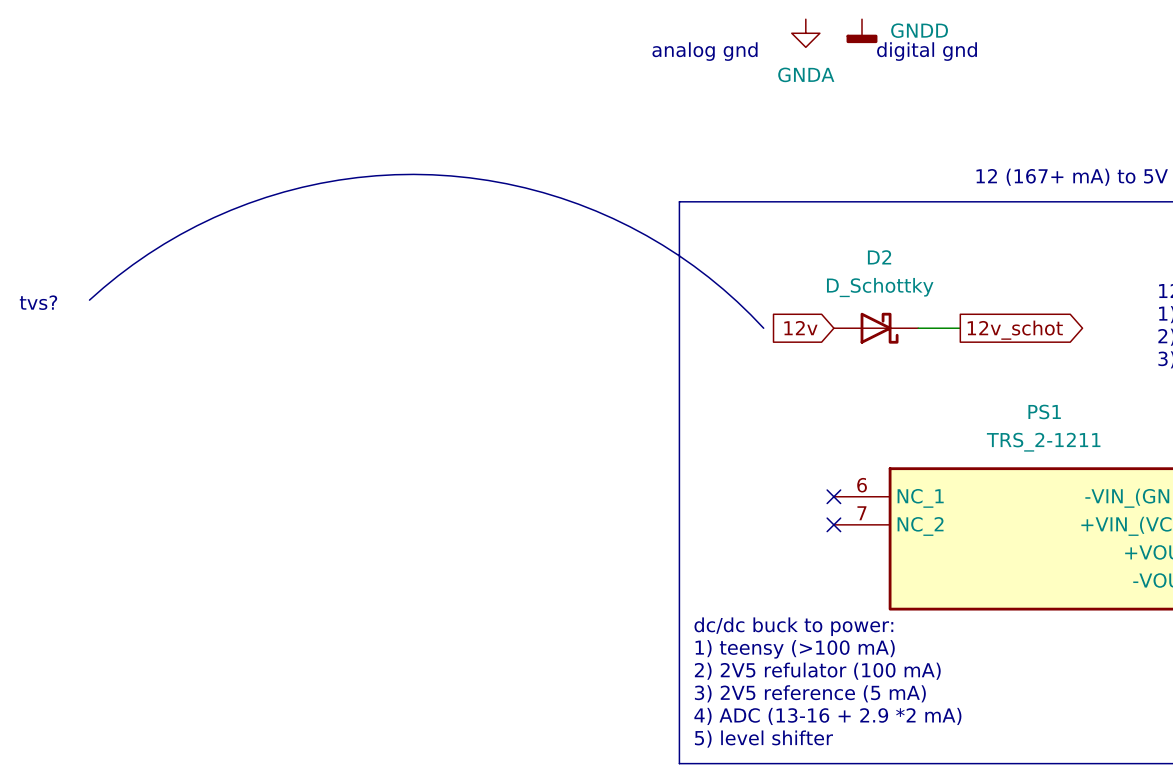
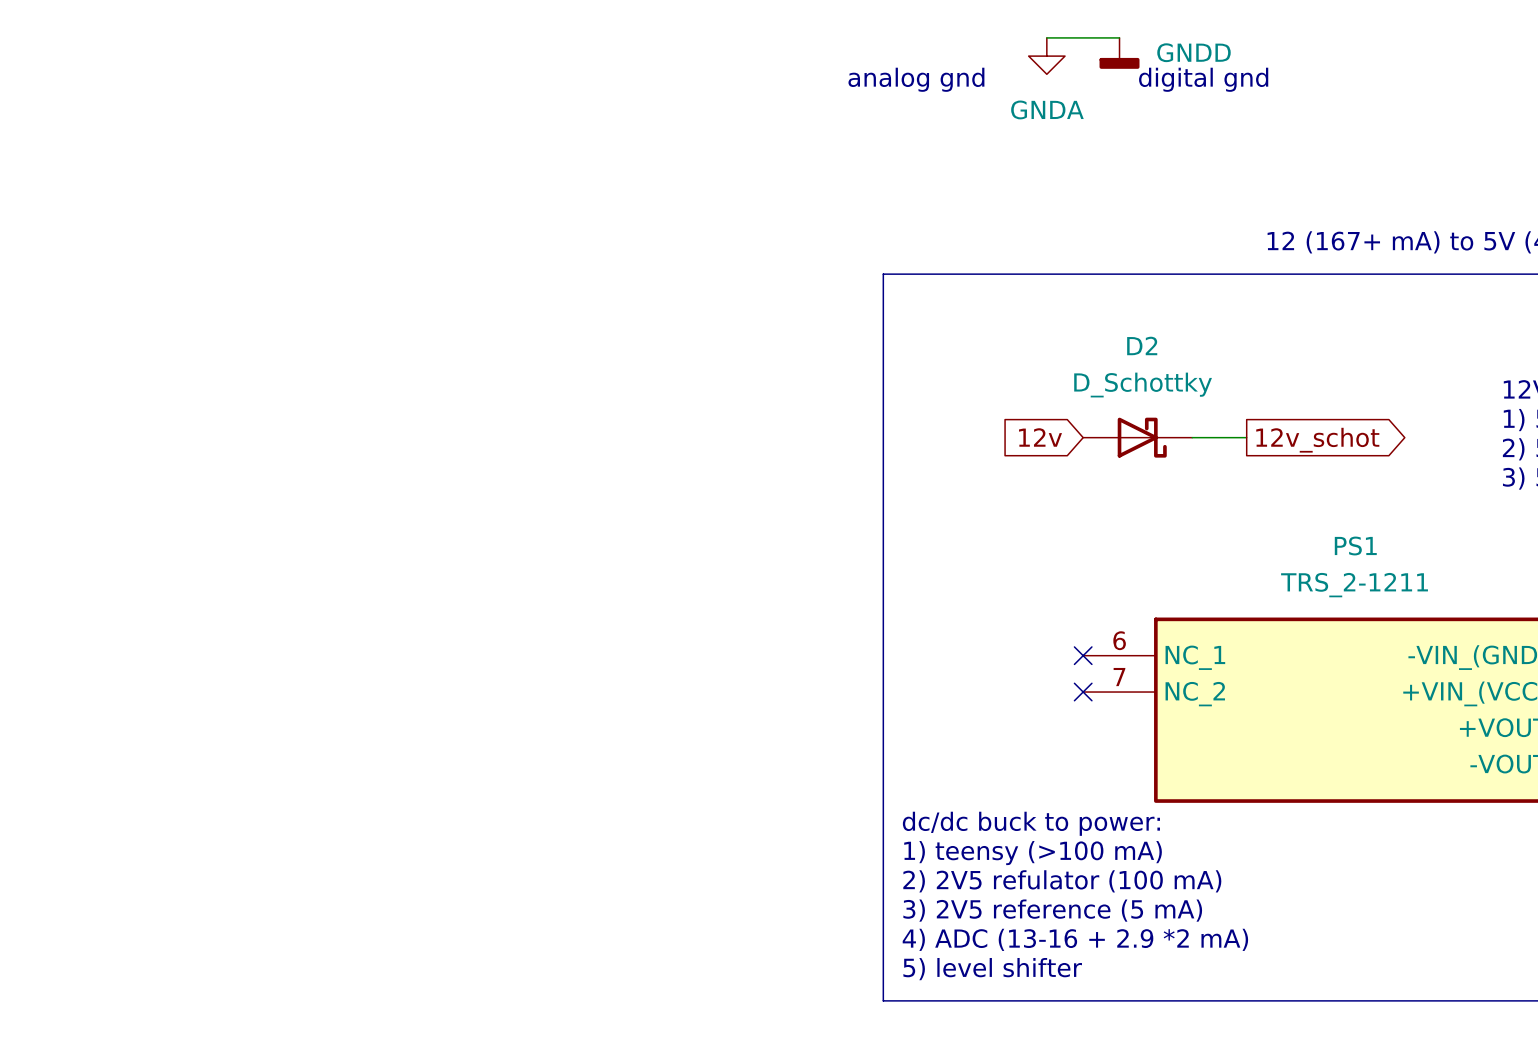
wire: none -> (1046, 37) (1119, 37)
line: (89, 300) (118, 275) (164, 243) (197, 225) (248, 203) (284, 191) (339, 180) (394, 174) (432, 174) (469, 177) (524, 187) (561, 198) (613, 218) (662, 245) (693, 266) (737, 301) (763, 328) -> none
text: tvs? (38, 302) -> none

